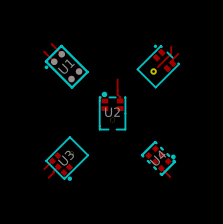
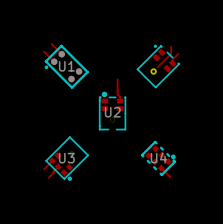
U1 name rotation: 0° (66, 66) -> 45° clockwise (66, 66)
U3 name rotation: 0° (65, 158) -> 45° clockwise (66, 158)
U4 name rotation: 0° (157, 158) -> 45° clockwise (158, 157)

